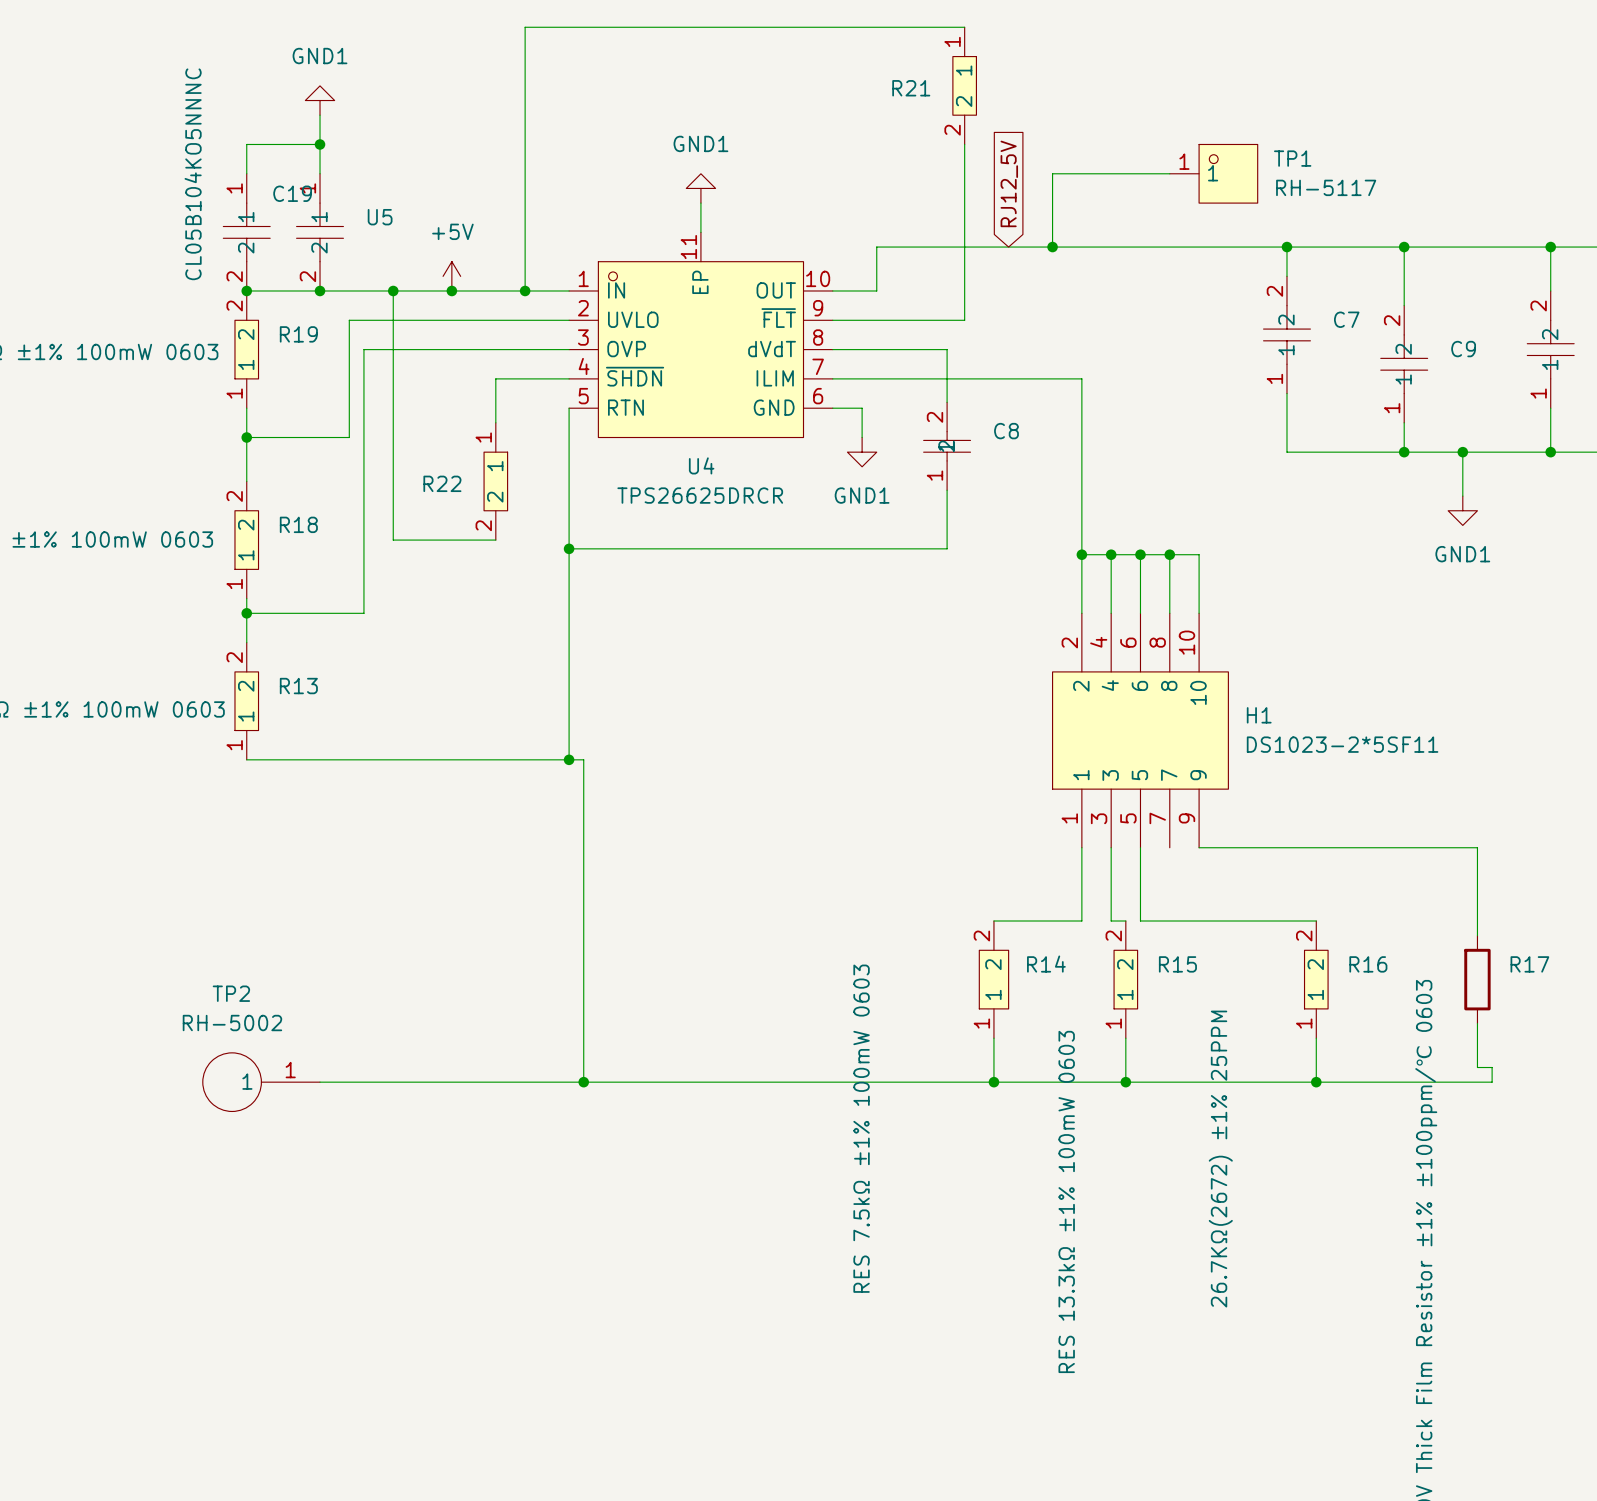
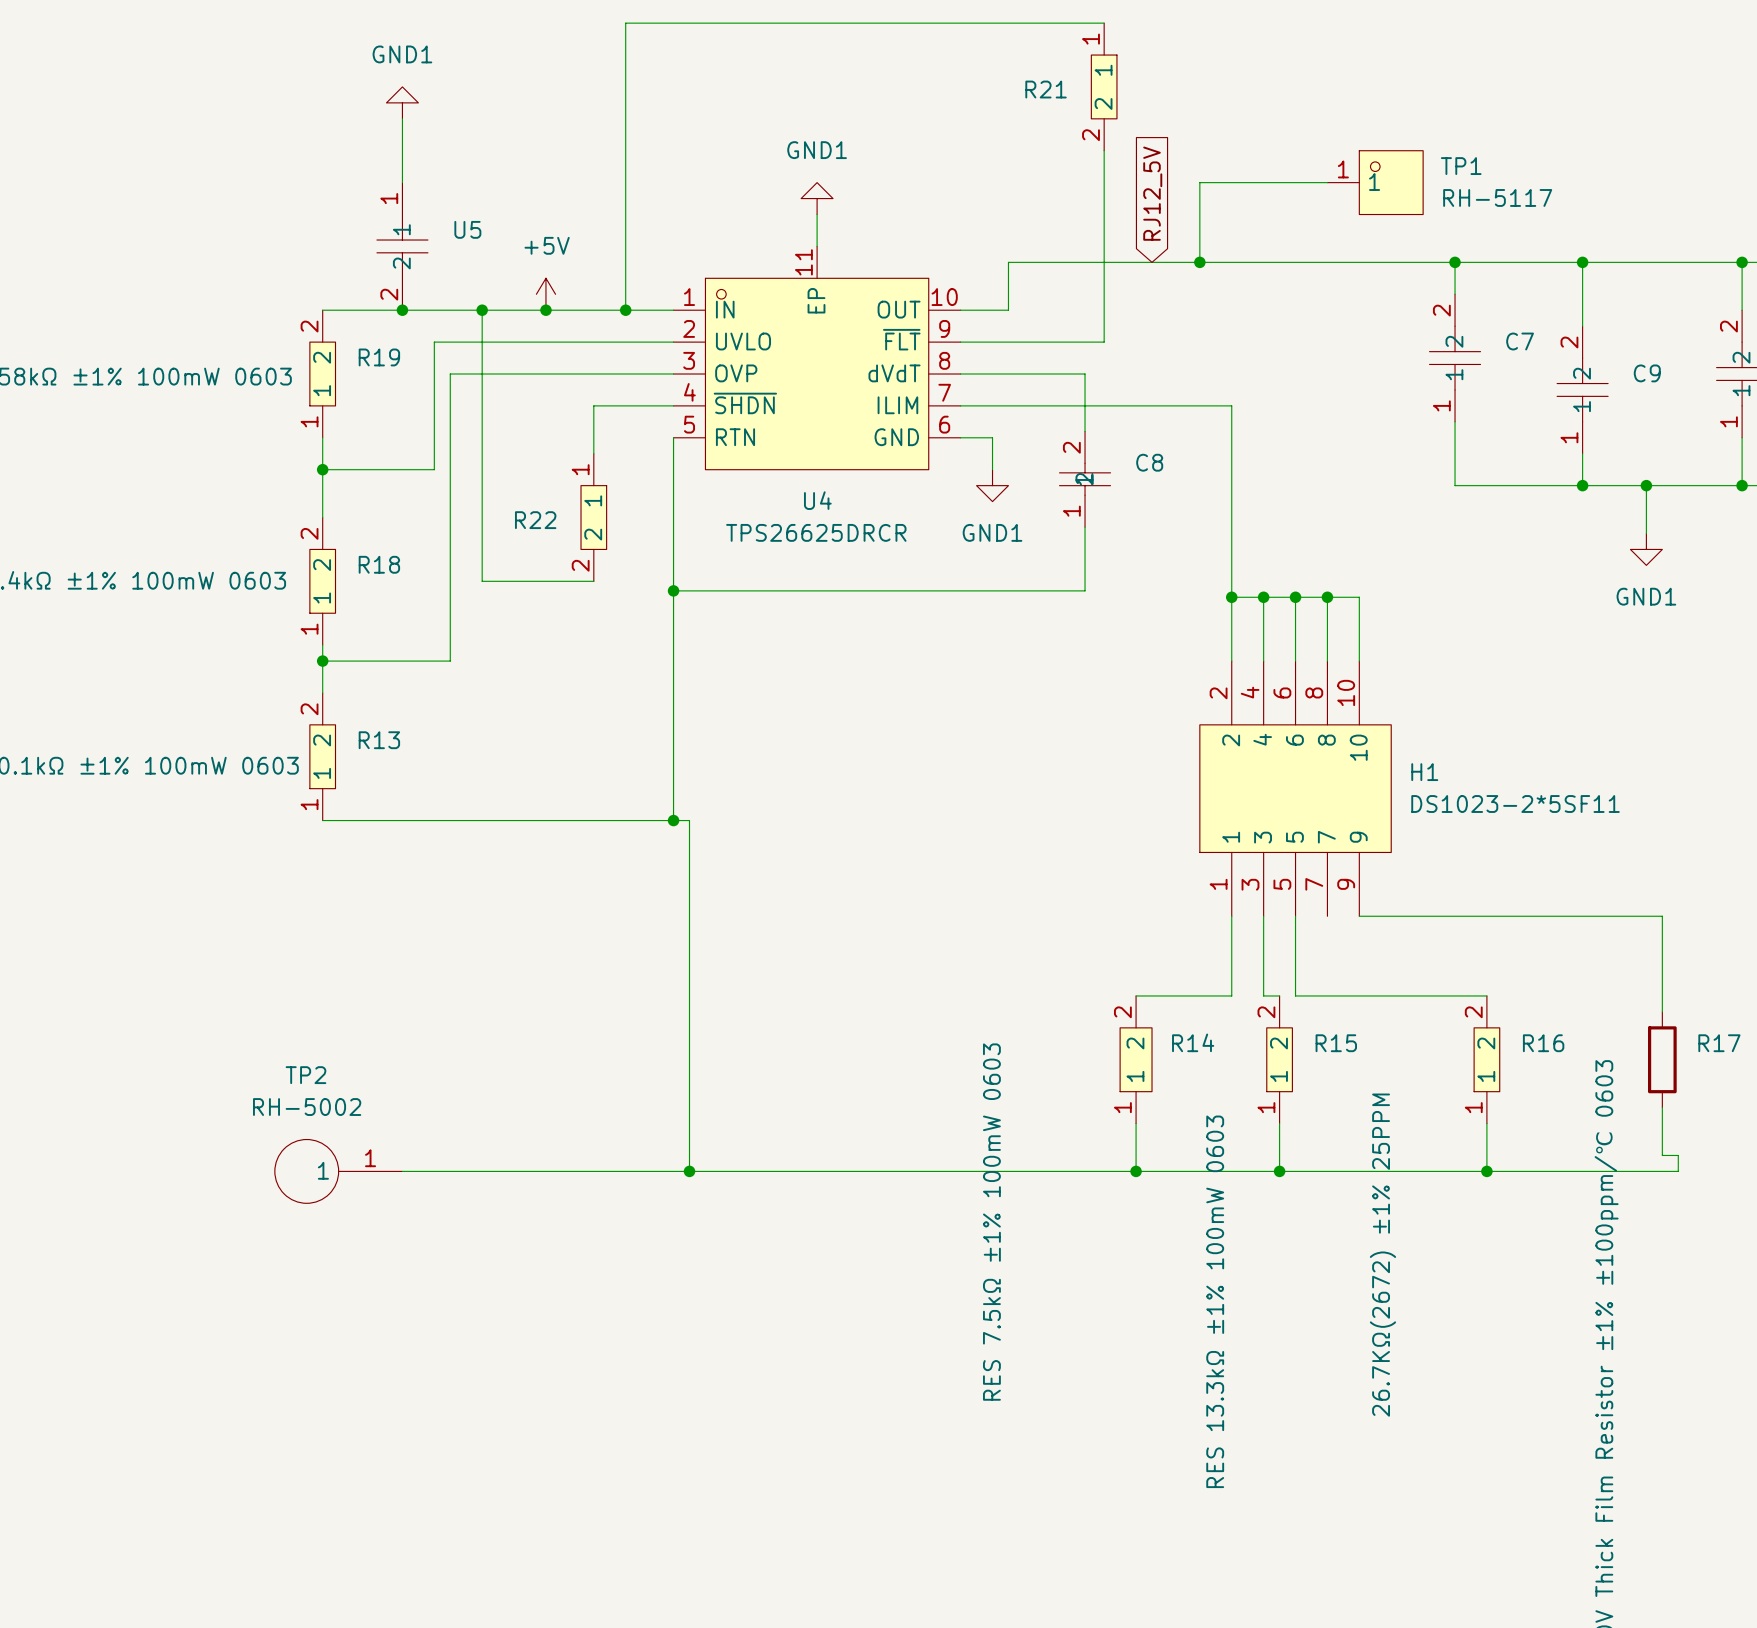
wire: (320, 144) (246, 144) (246, 173) -> none
junction: (320, 144) -> none
C19: CL05B104KO5NNNC (246, 232) -> none
junction: (246, 290) -> none

